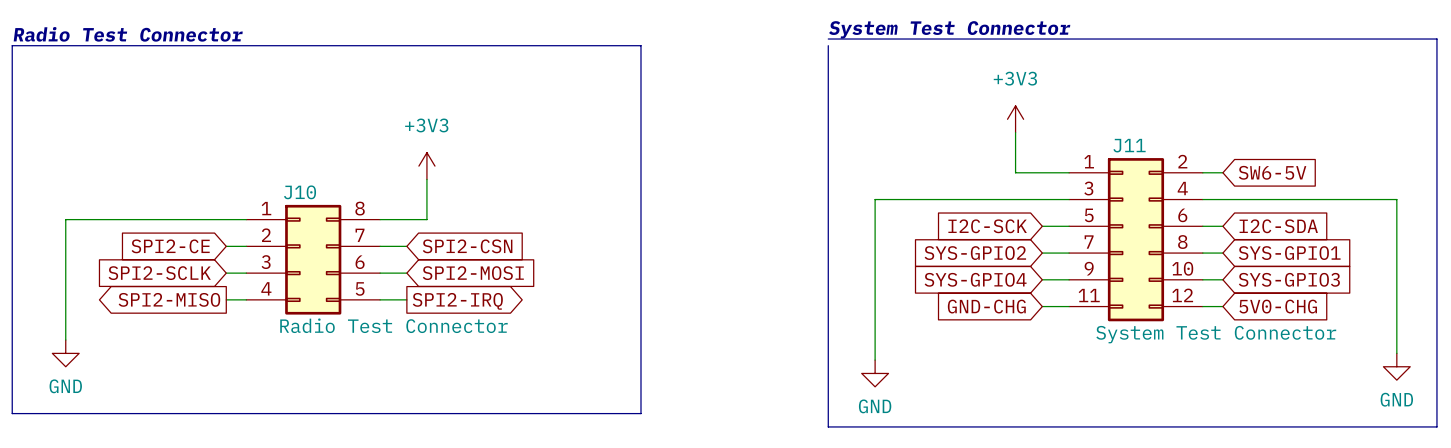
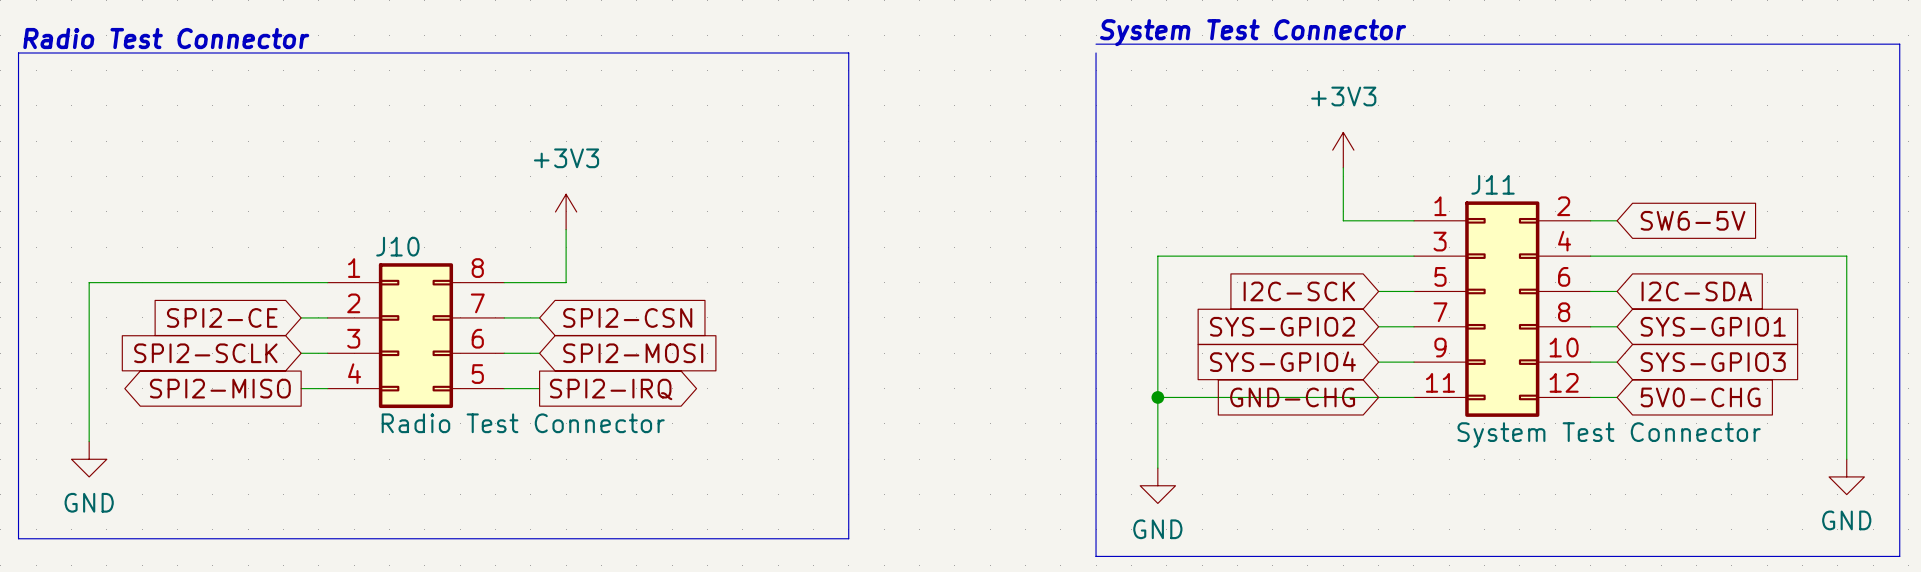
wire: none -> (1157, 397) (1378, 397)
junction: none -> (1157, 397)

